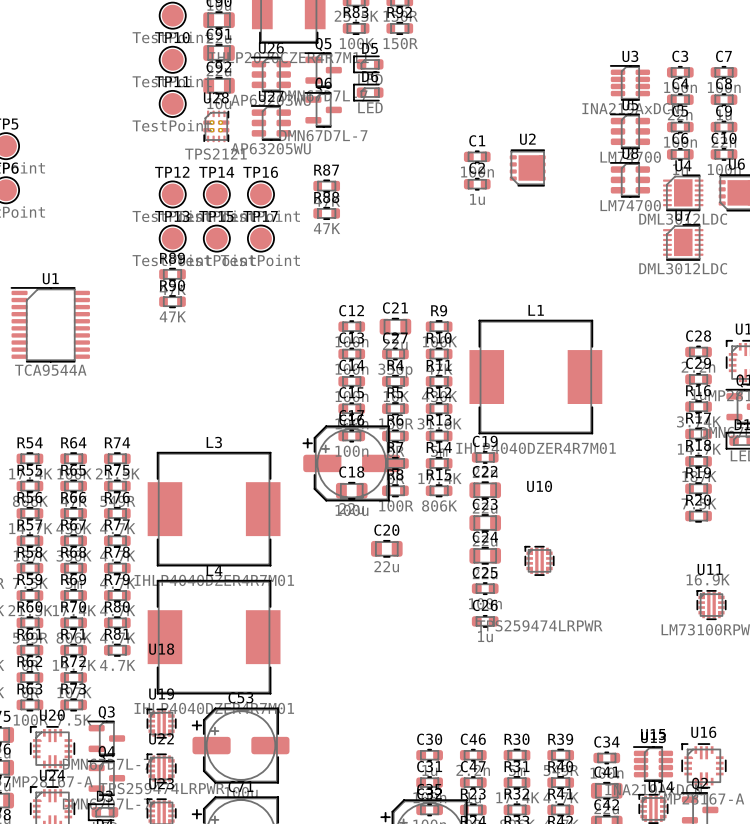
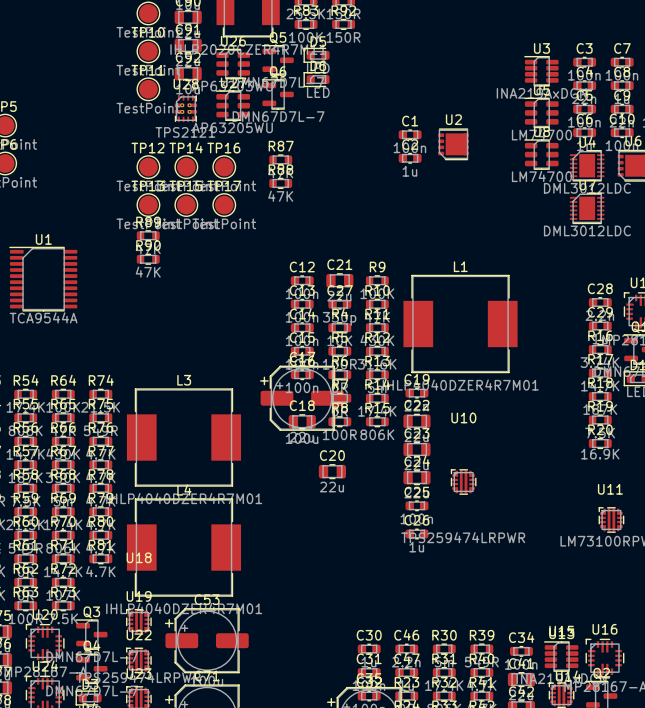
R20 value position: 16.9K (708, 579) -> 16.9K (600, 454)

